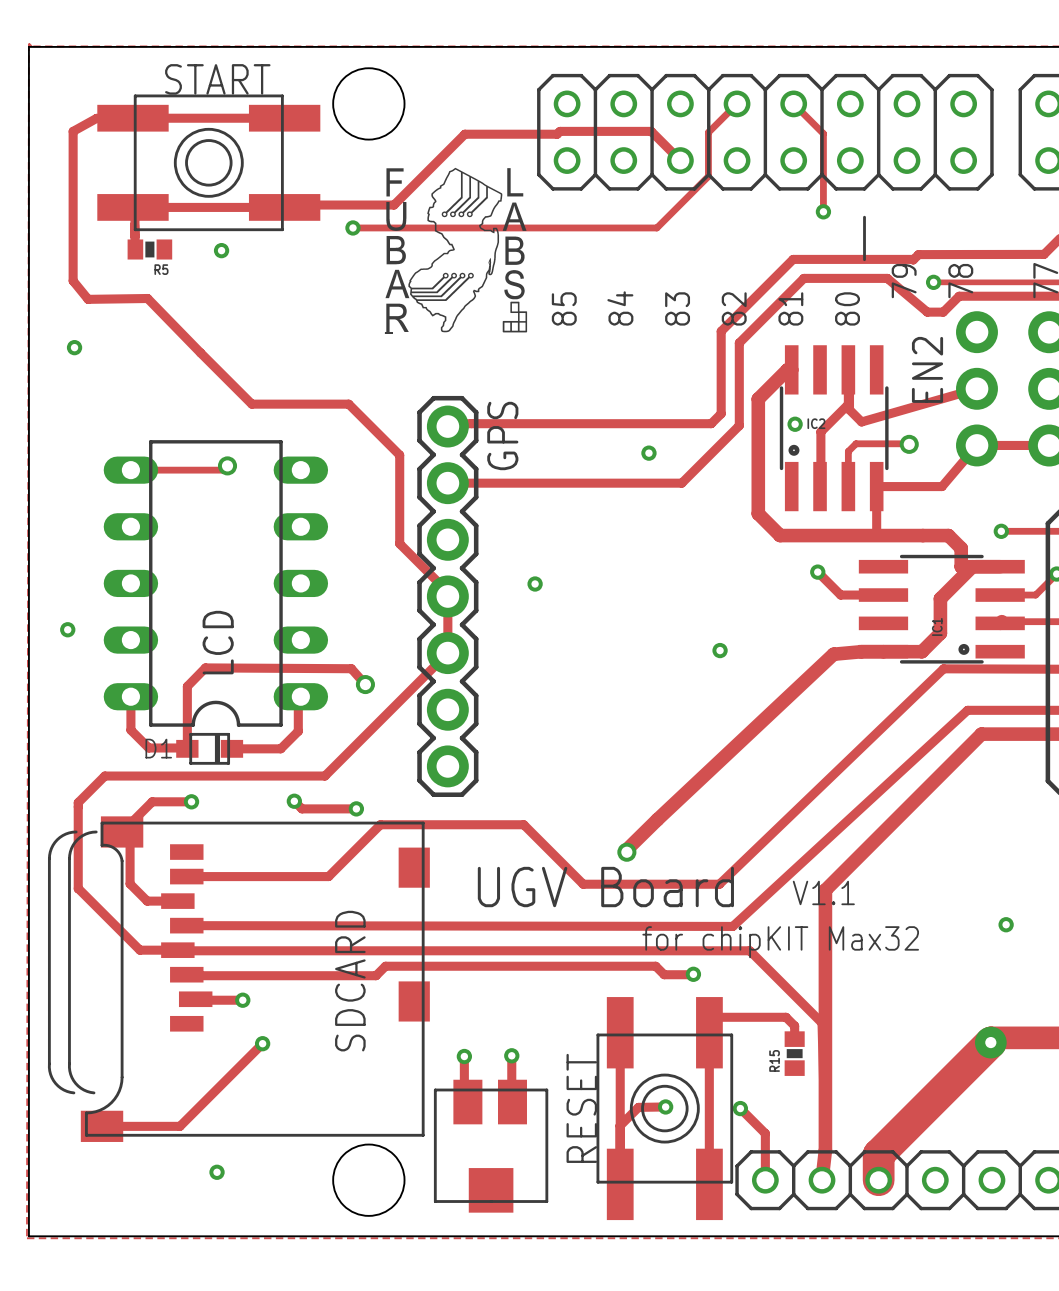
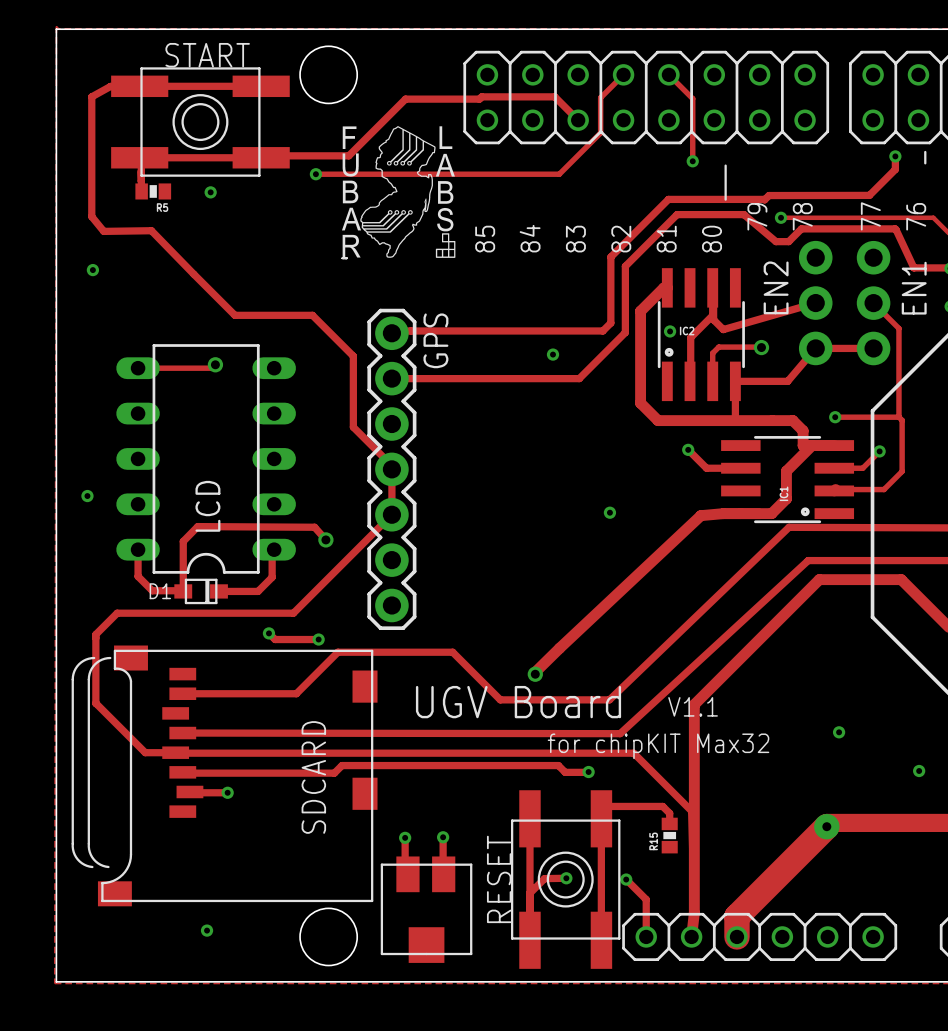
via: (535, 584) -> none
track: (191, 801) (152, 801) (122, 831) (130, 839) (130, 883) (147, 901) (177, 901) -> none
via: (191, 801) -> none
track: (262, 1043) (179, 1126) (102, 1126) -> none
via: (262, 1043) -> none

